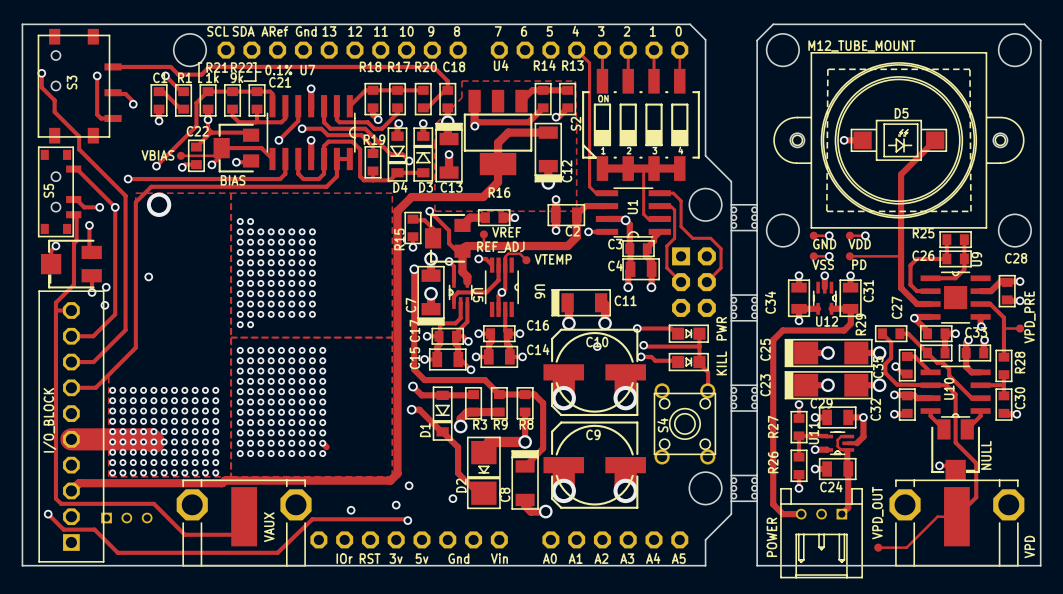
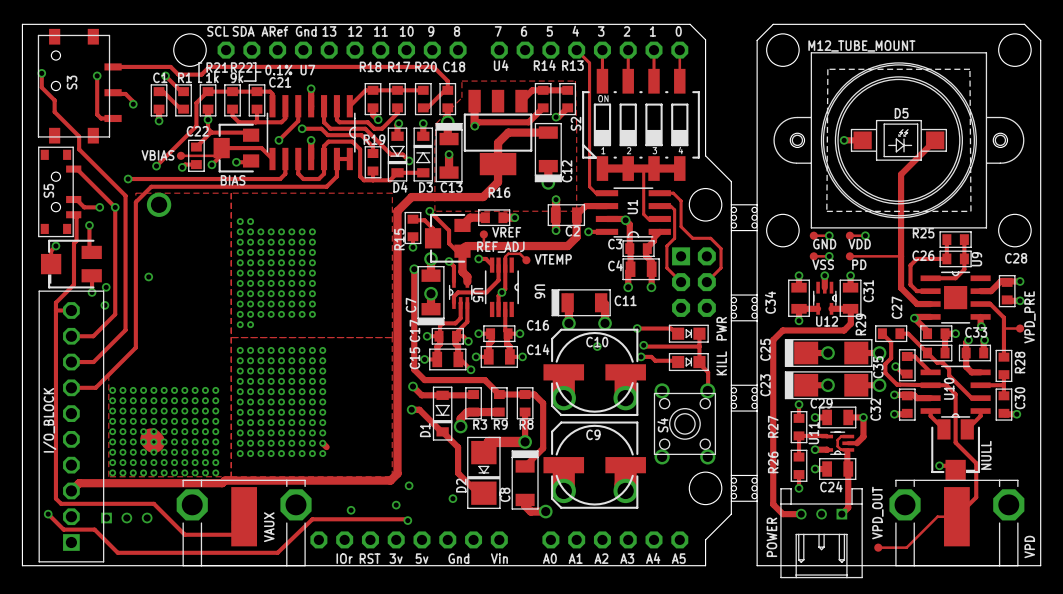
track: (71, 439) (151, 439) -> none

